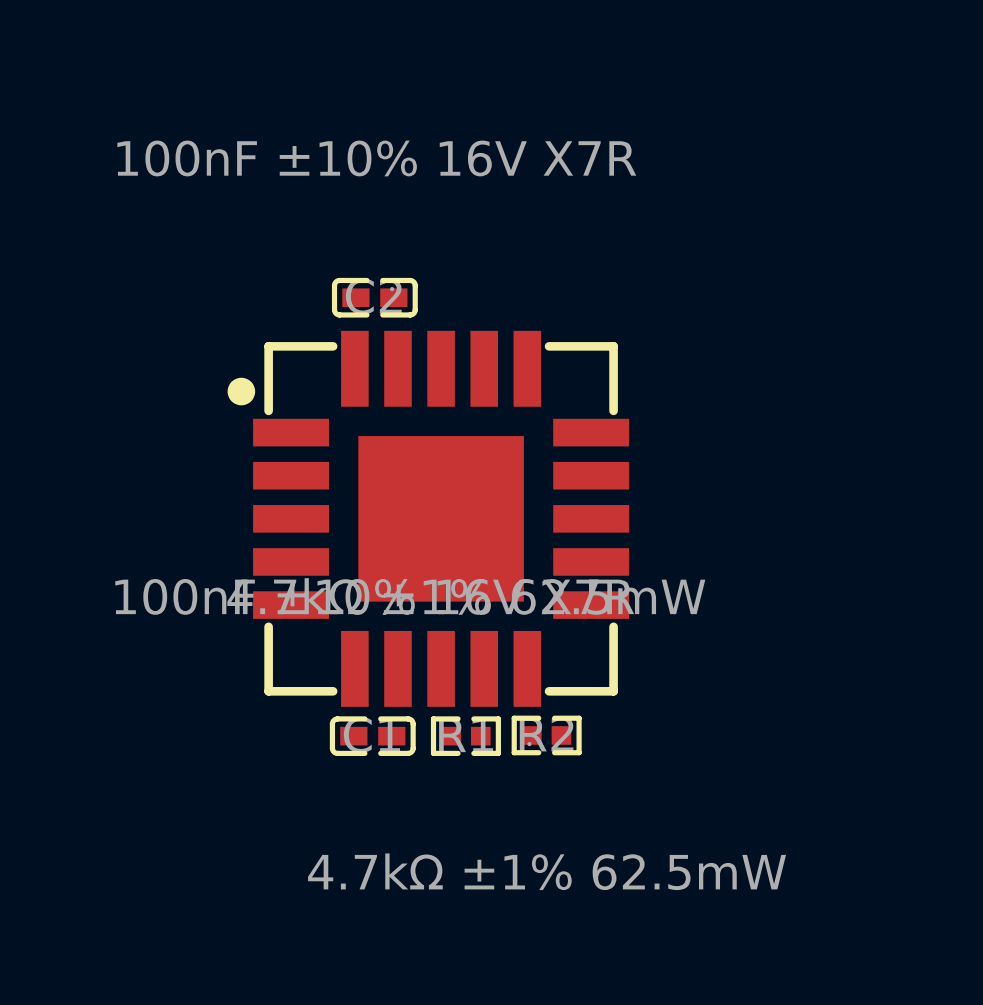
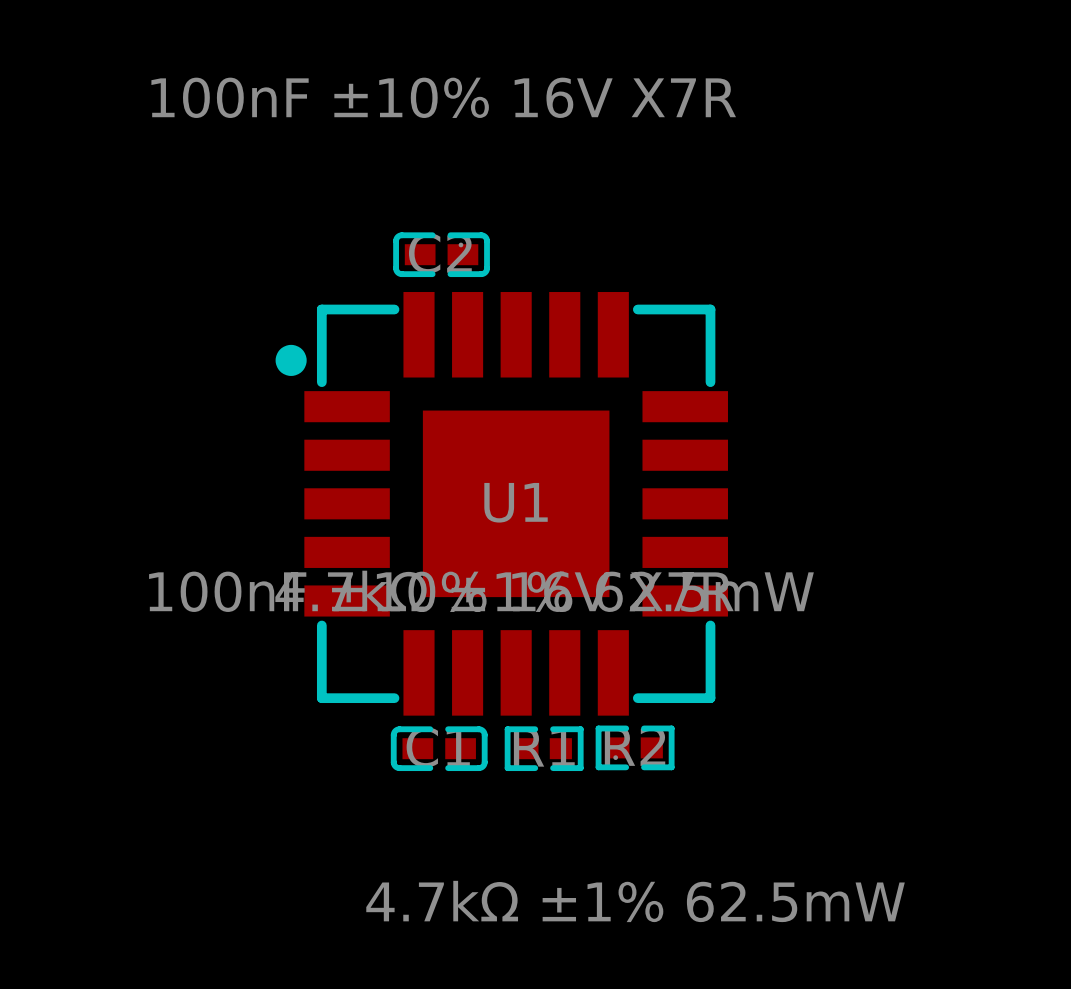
U1 name: none -> U1 (516, 502)

